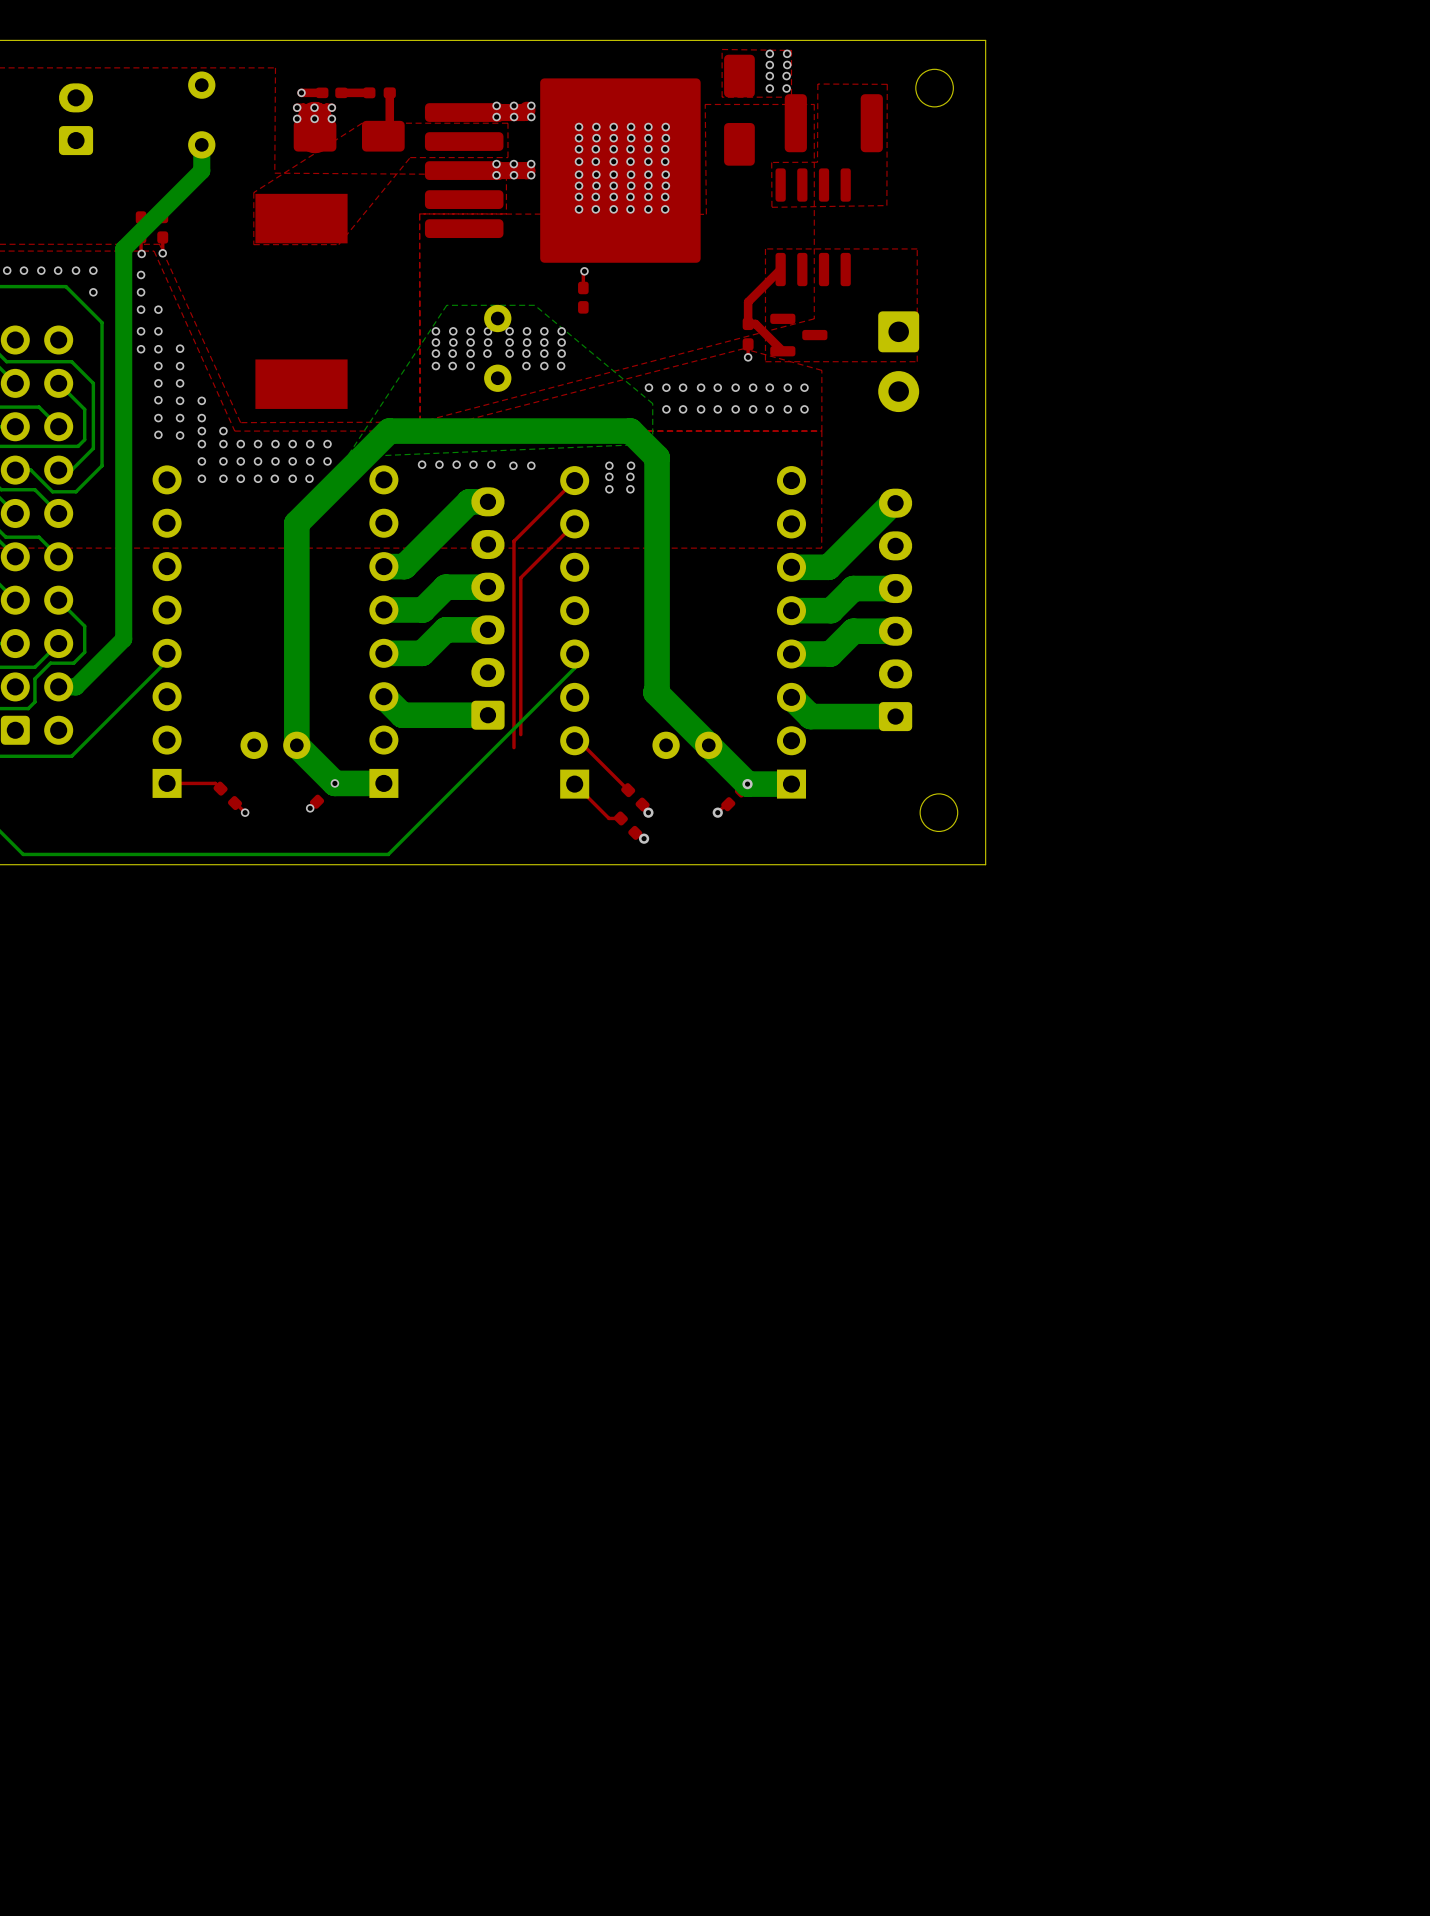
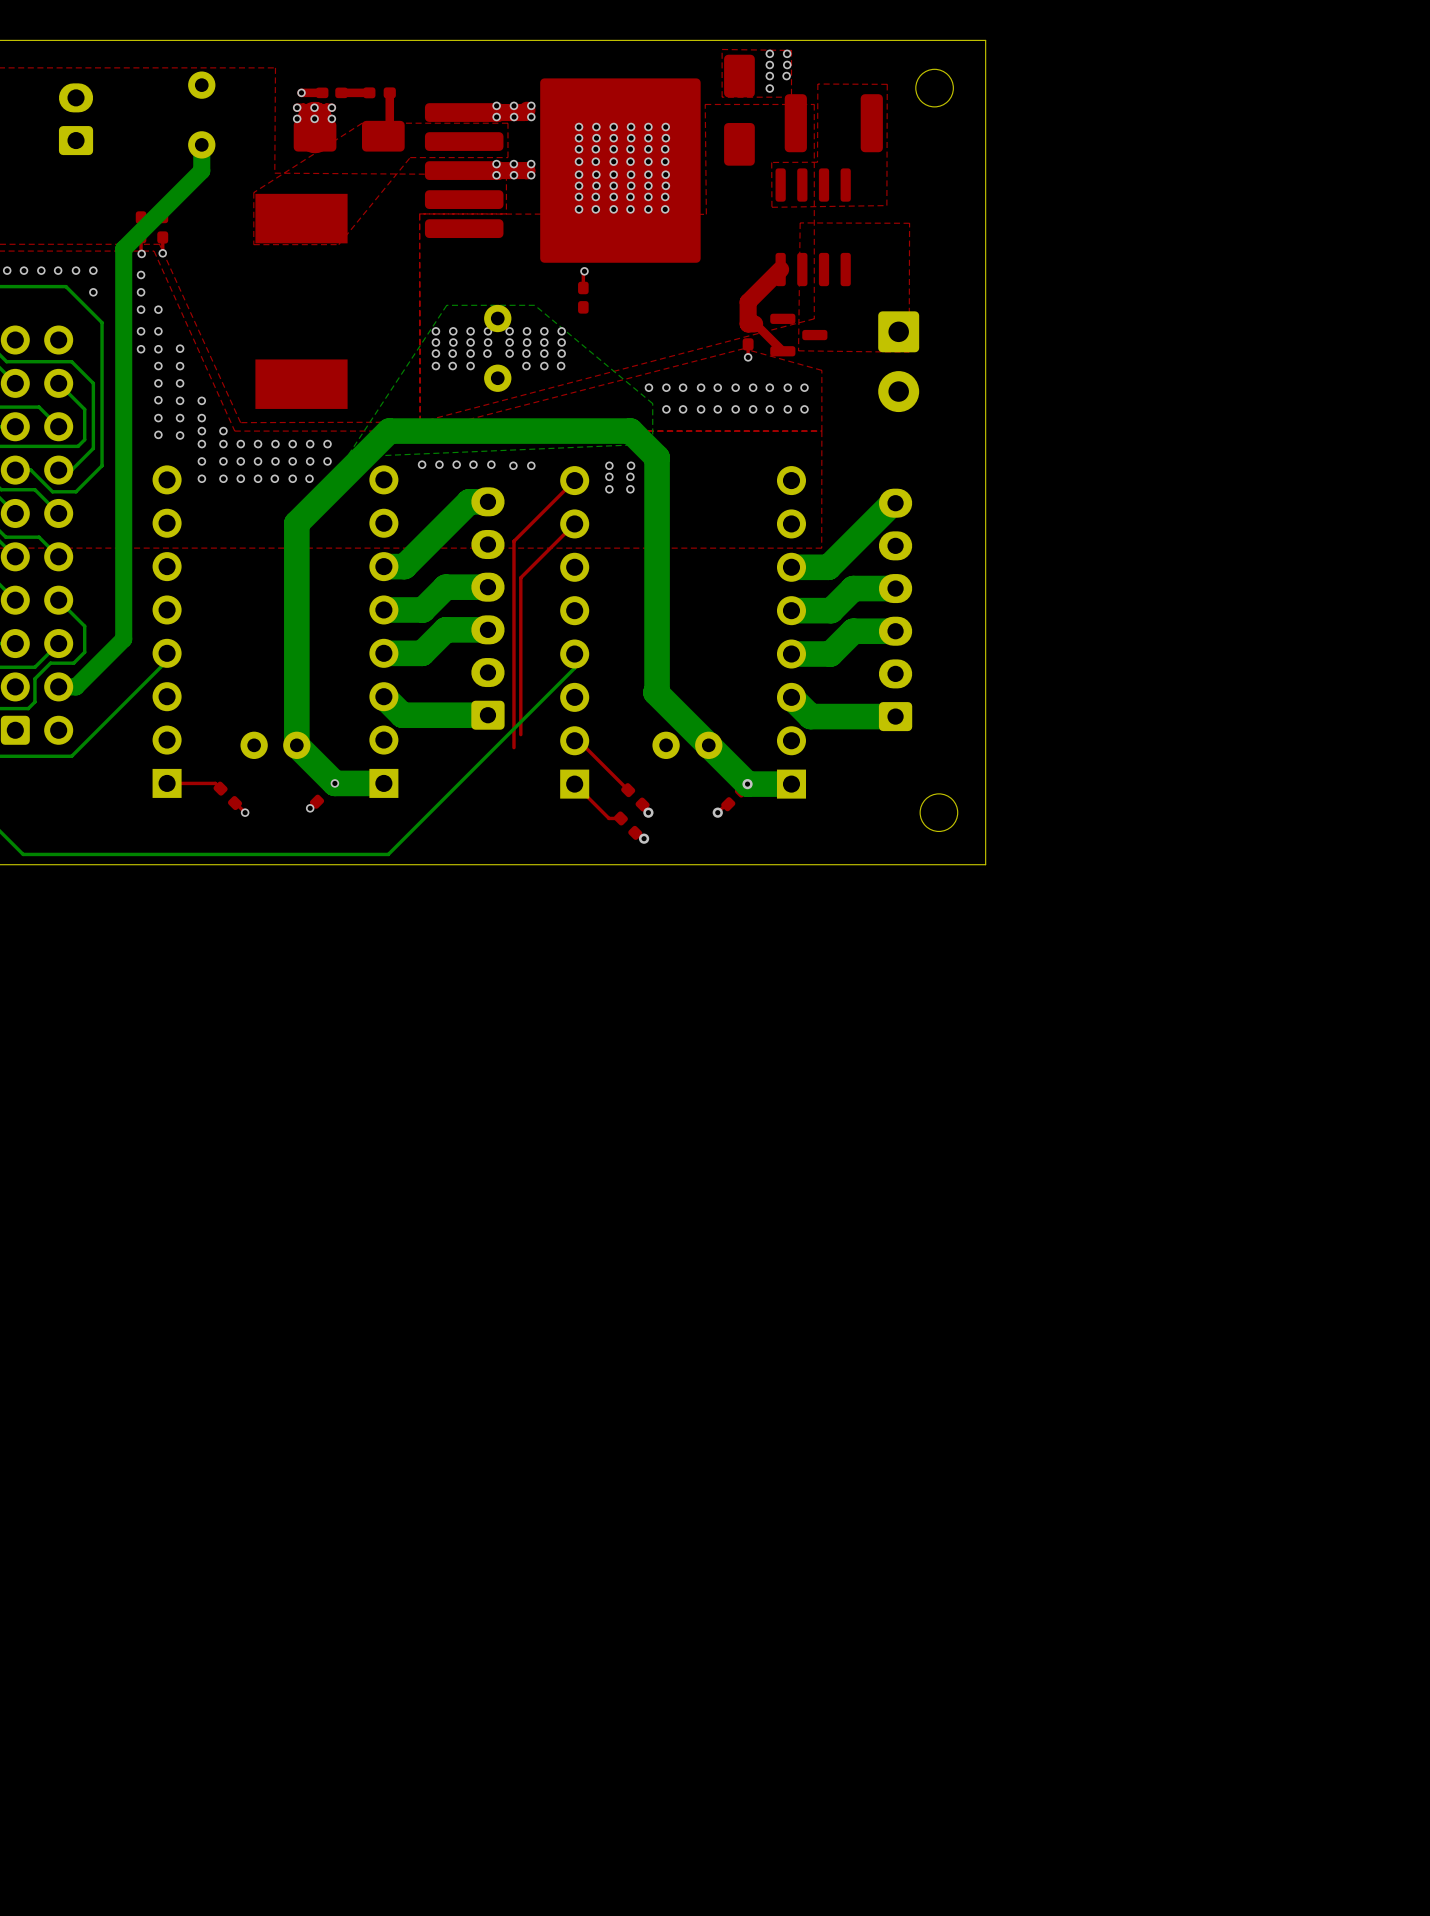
via: (786, 88) -> none
top zone outline: (917, 248) (917, 361) (765, 361) (765, 248) (917, 248) -> (800, 222) (909, 223) (909, 352) (798, 350) (800, 222)
top track width: thin (780, 269) (748, 302) (748, 323) (754, 323) -> thick (780, 269) (748, 302) (748, 323) (754, 323)

